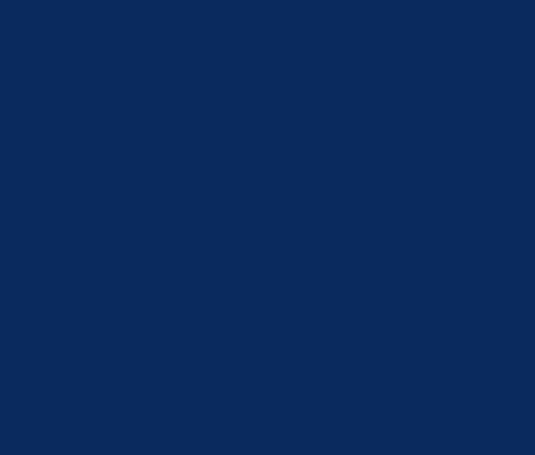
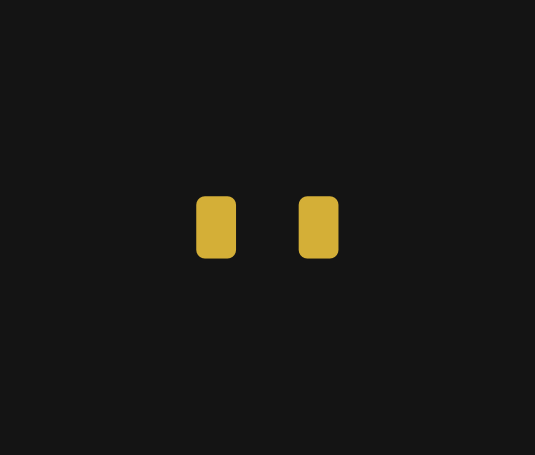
part: none -> (267, 227)

